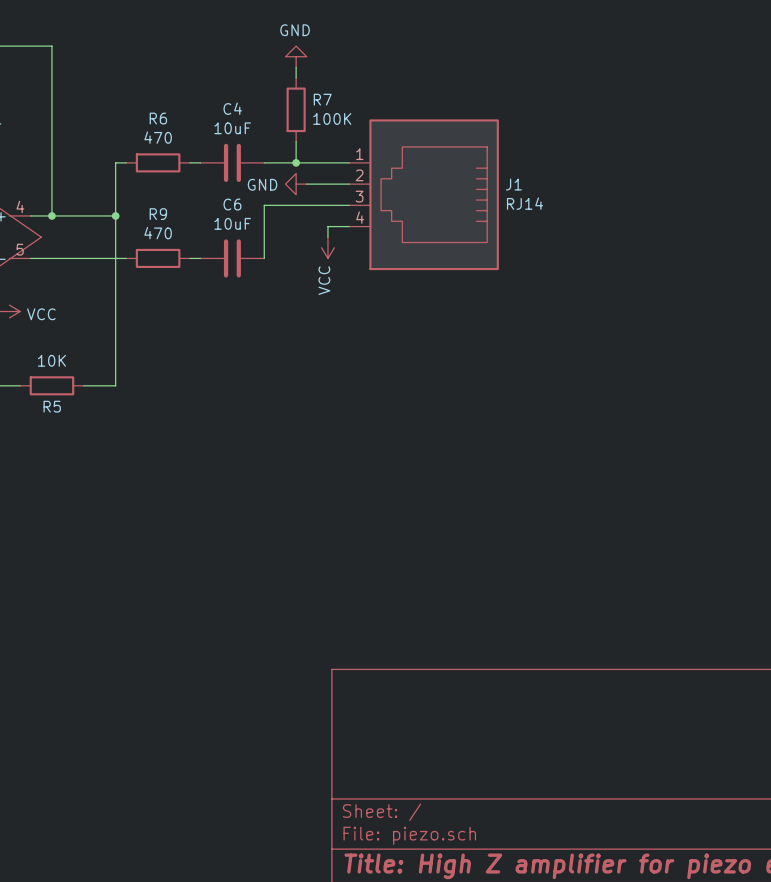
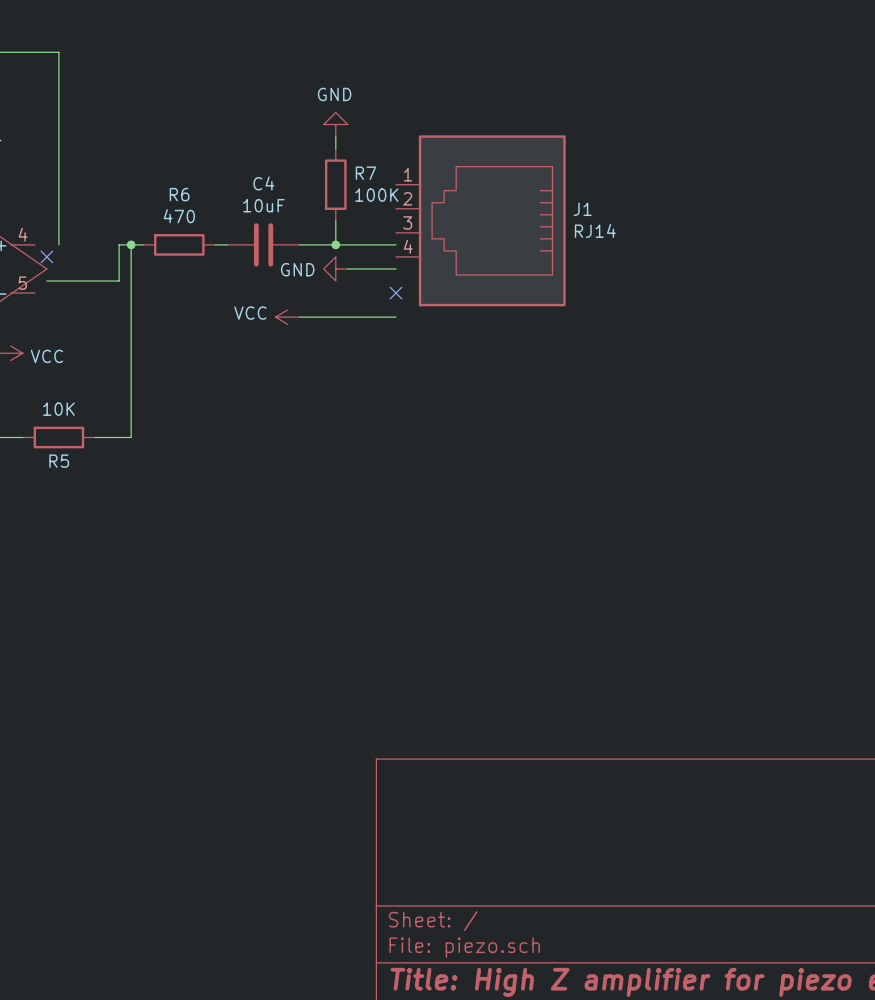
power symbol: GND (296, 56) -> none
wire: (296, 67) (296, 77) -> (335, 136) (335, 148)
power symbol: none -> GND (335, 124)
R7 position: (296, 109) -> (335, 184)
wire: (296, 141) (296, 162) -> (335, 220) (335, 244)
wire: (126, 162) (115, 162) (115, 215) -> (143, 244) (131, 244)
R6 position: (158, 162) -> (179, 244)
wire: (189, 162) (200, 162) -> (215, 244) (227, 244)
C4 position: (232, 162) -> (263, 244)
wire: (264, 162) (349, 162) -> (299, 244) (395, 244)
junction: (296, 162) -> none
power symbol: GND (296, 184) -> none
wire: (306, 184) (349, 184) -> (347, 268) (395, 268)
wire: (349, 205) (264, 205) (264, 258) -> none
wire: (30, 215) (105, 215) -> (46, 281) (119, 281) (119, 244)
junction: (51, 215) -> none
junction: none -> (335, 244)
no-connect mark: none -> (46, 256)
wire: (349, 226) (327, 226) (327, 237) -> none
power symbol: none -> GND (335, 268)
power symbol rotation: 0° (327, 247) -> 90° clockwise (287, 317)
power symbol position: VCC (327, 247) -> VCC (287, 317)
wire: (30, 258) (126, 258) -> none
R9: 470 (158, 258) -> none
wire: (189, 258) (200, 258) -> none
C6: 10uF (232, 258) -> none
no-connect mark: none -> (395, 293)
wire: none -> (299, 317) (395, 317)

